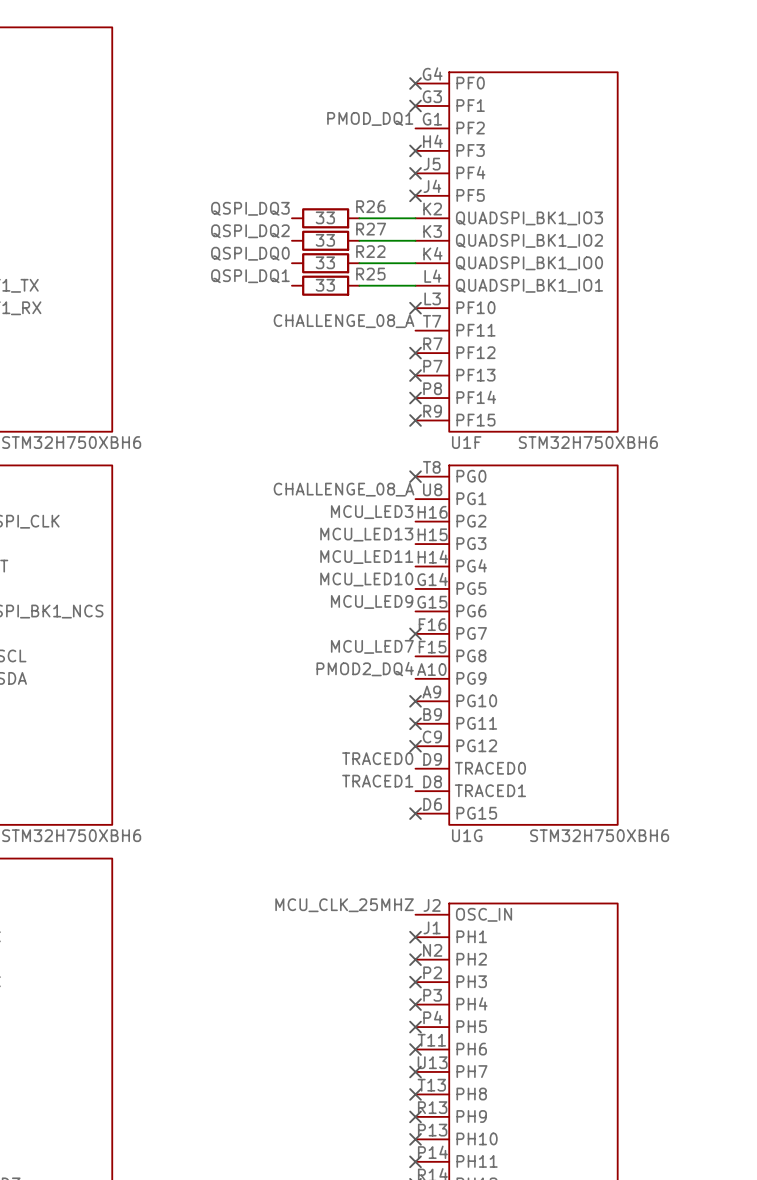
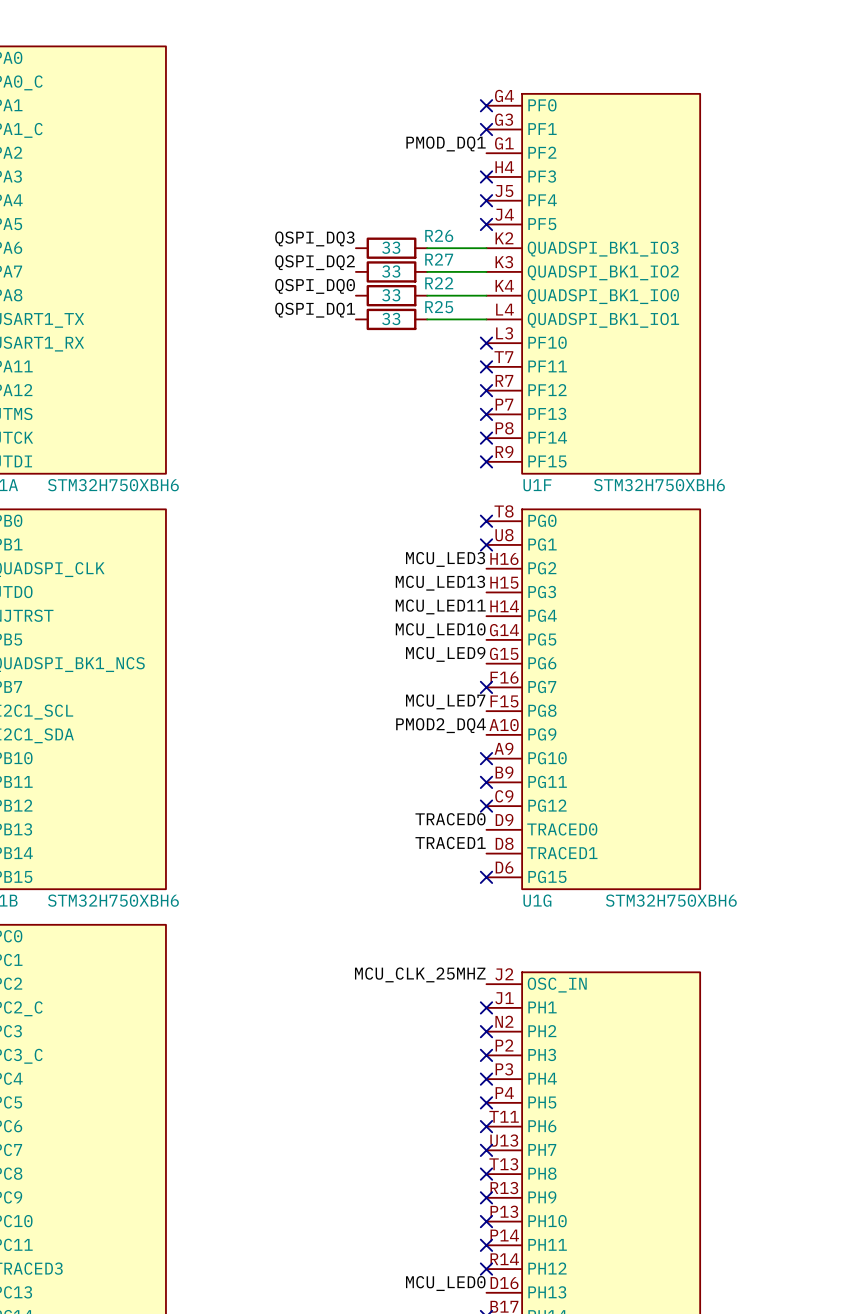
label: CHALLENGE_08_A (344, 321) -> none
no-connect mark: none -> (486, 366)
label: CHALLENGE_08_A (344, 489) -> none
no-connect mark: none -> (486, 544)

